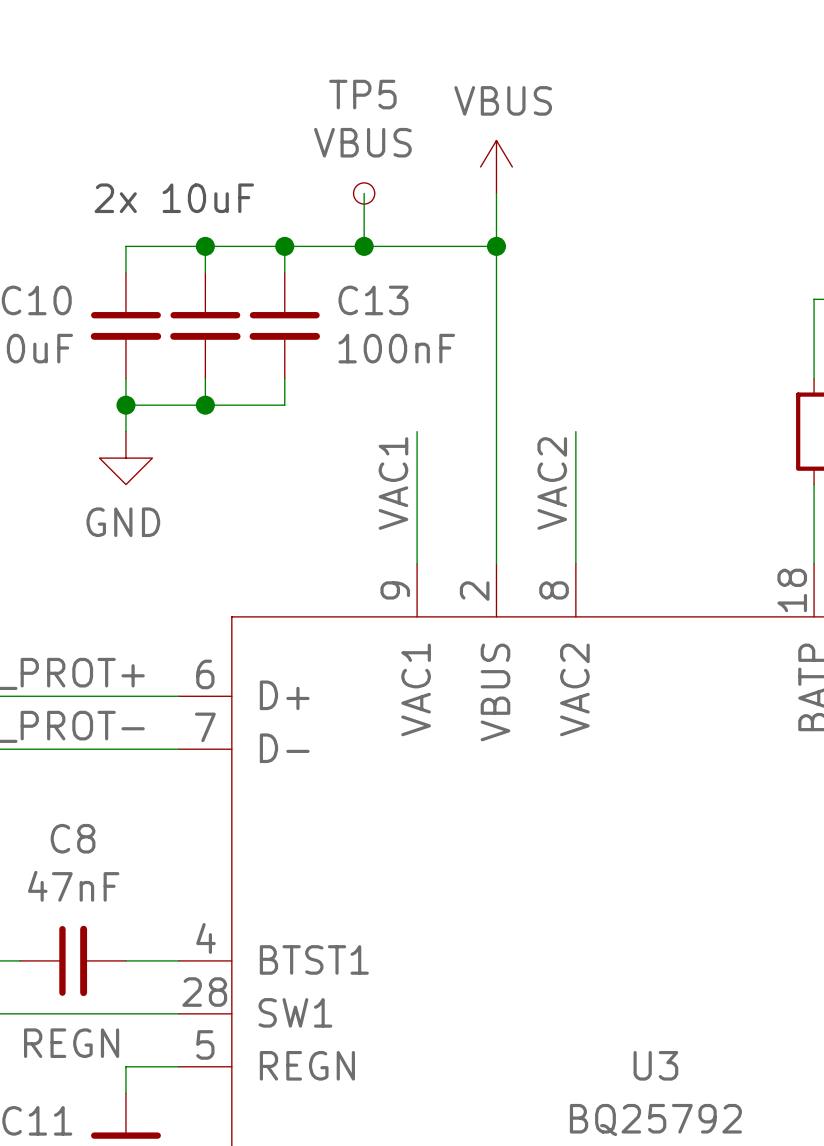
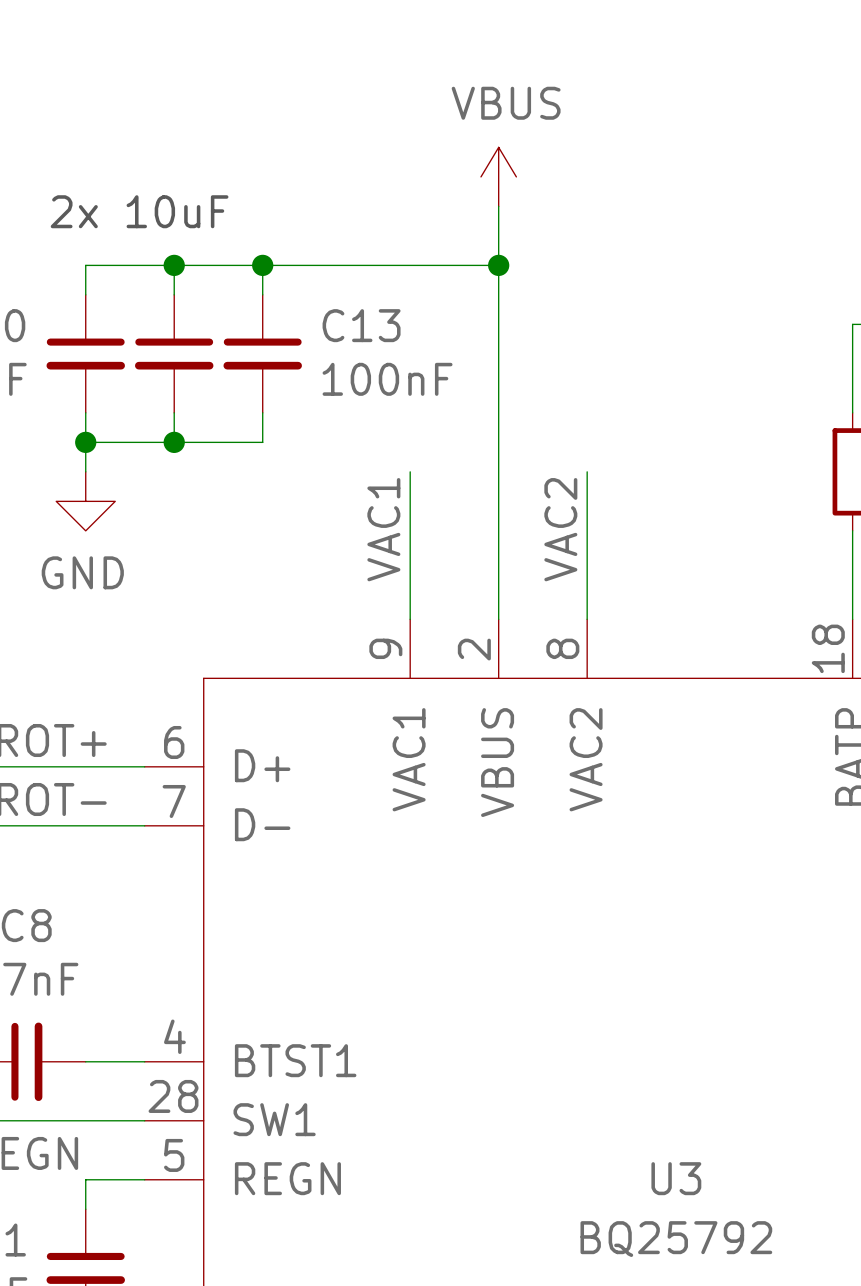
wire: (364, 193) (364, 246) -> none
TP5: VBUS (364, 193) -> none
junction: (364, 246) -> none

